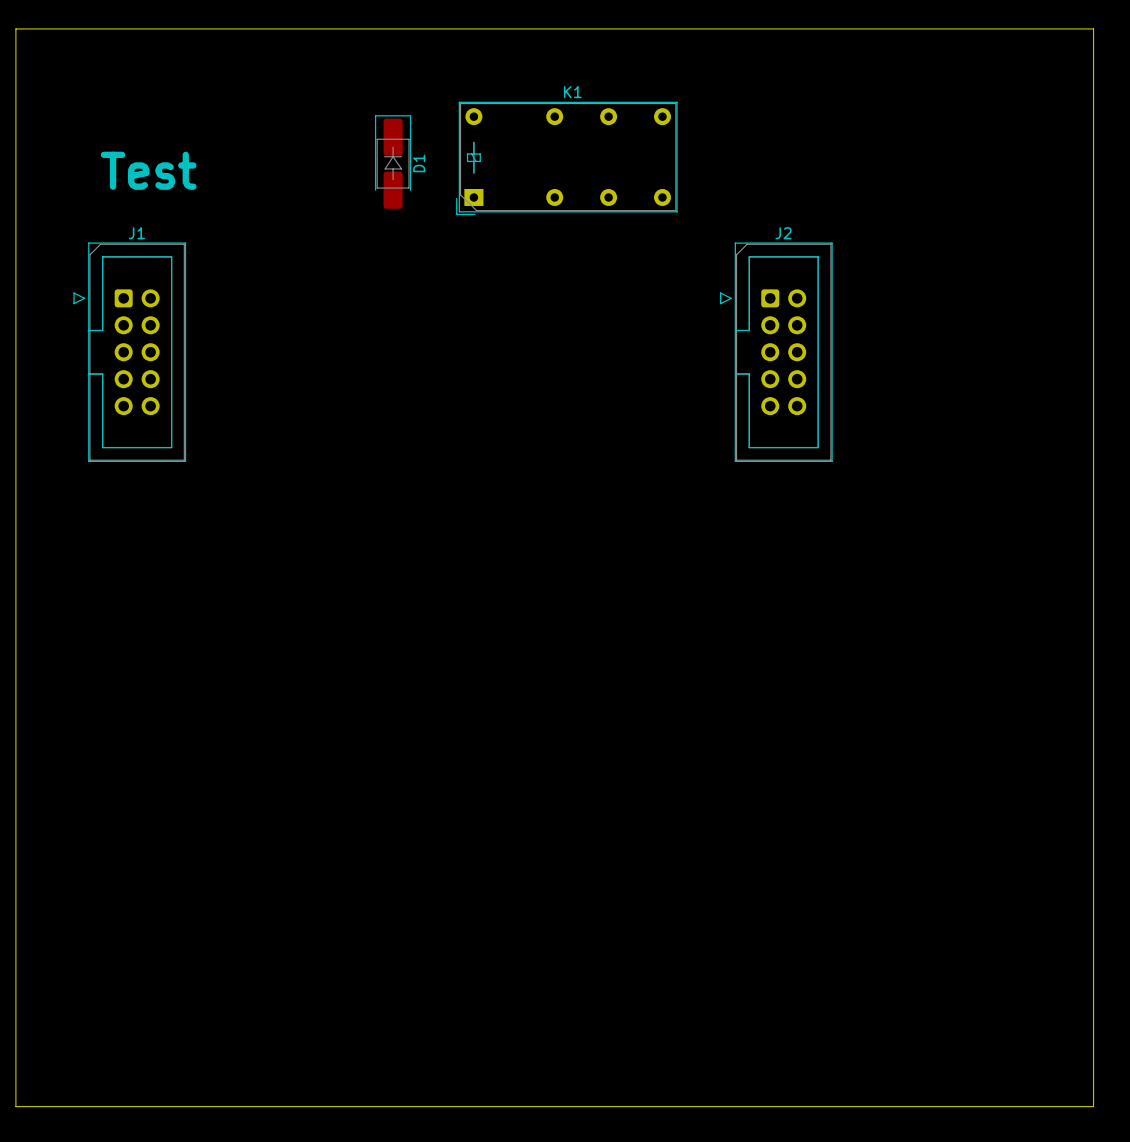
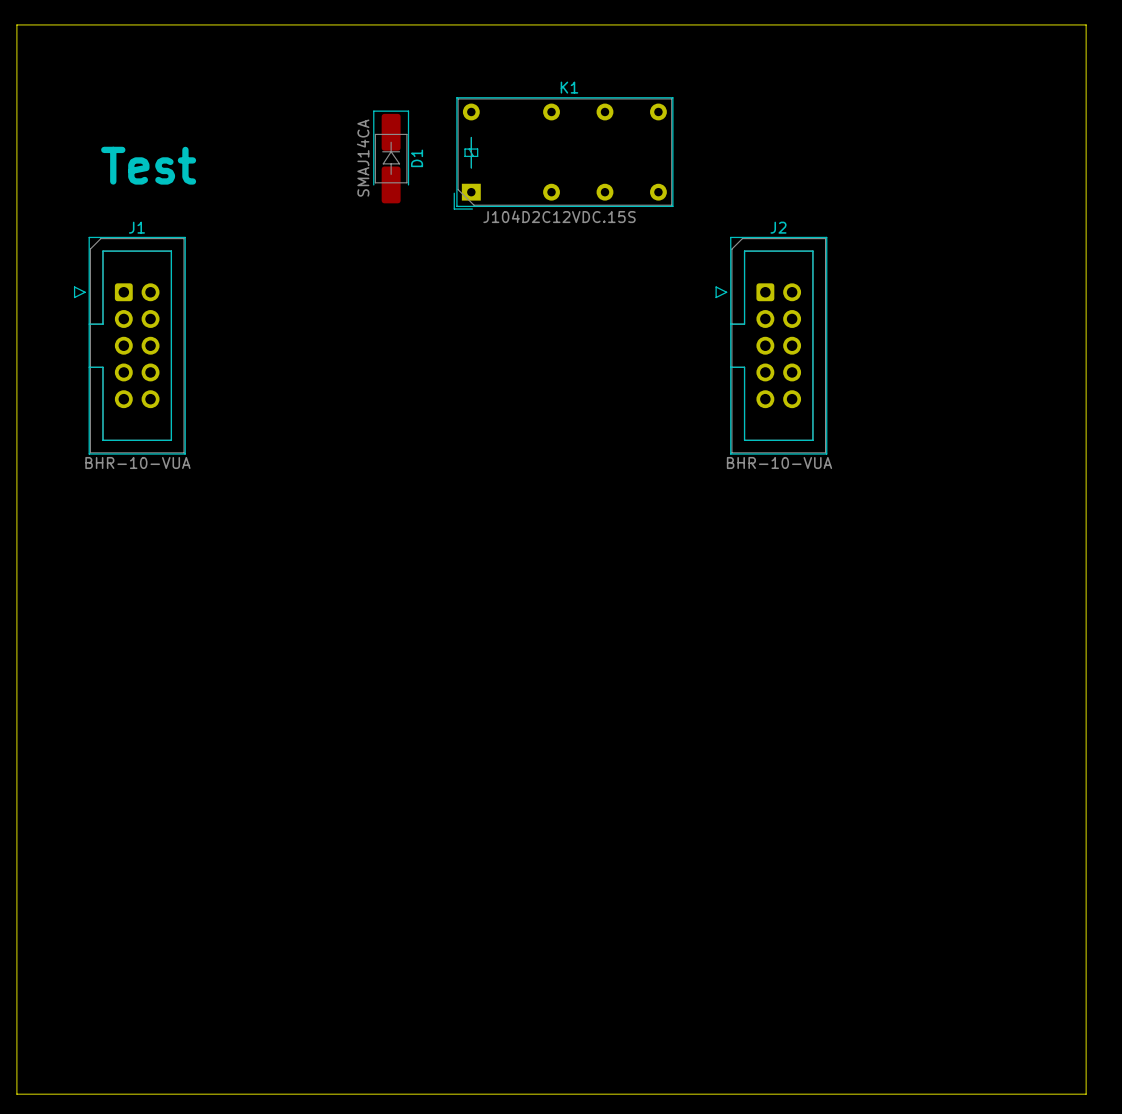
D1 value: none -> SMAJ14CA (363, 158)
K1 value: none -> J104D2C12VDC.15S (559, 216)
J1 value: none -> BHR-10-VUA (137, 462)
J2 value: none -> BHR-10-VUA (779, 462)

